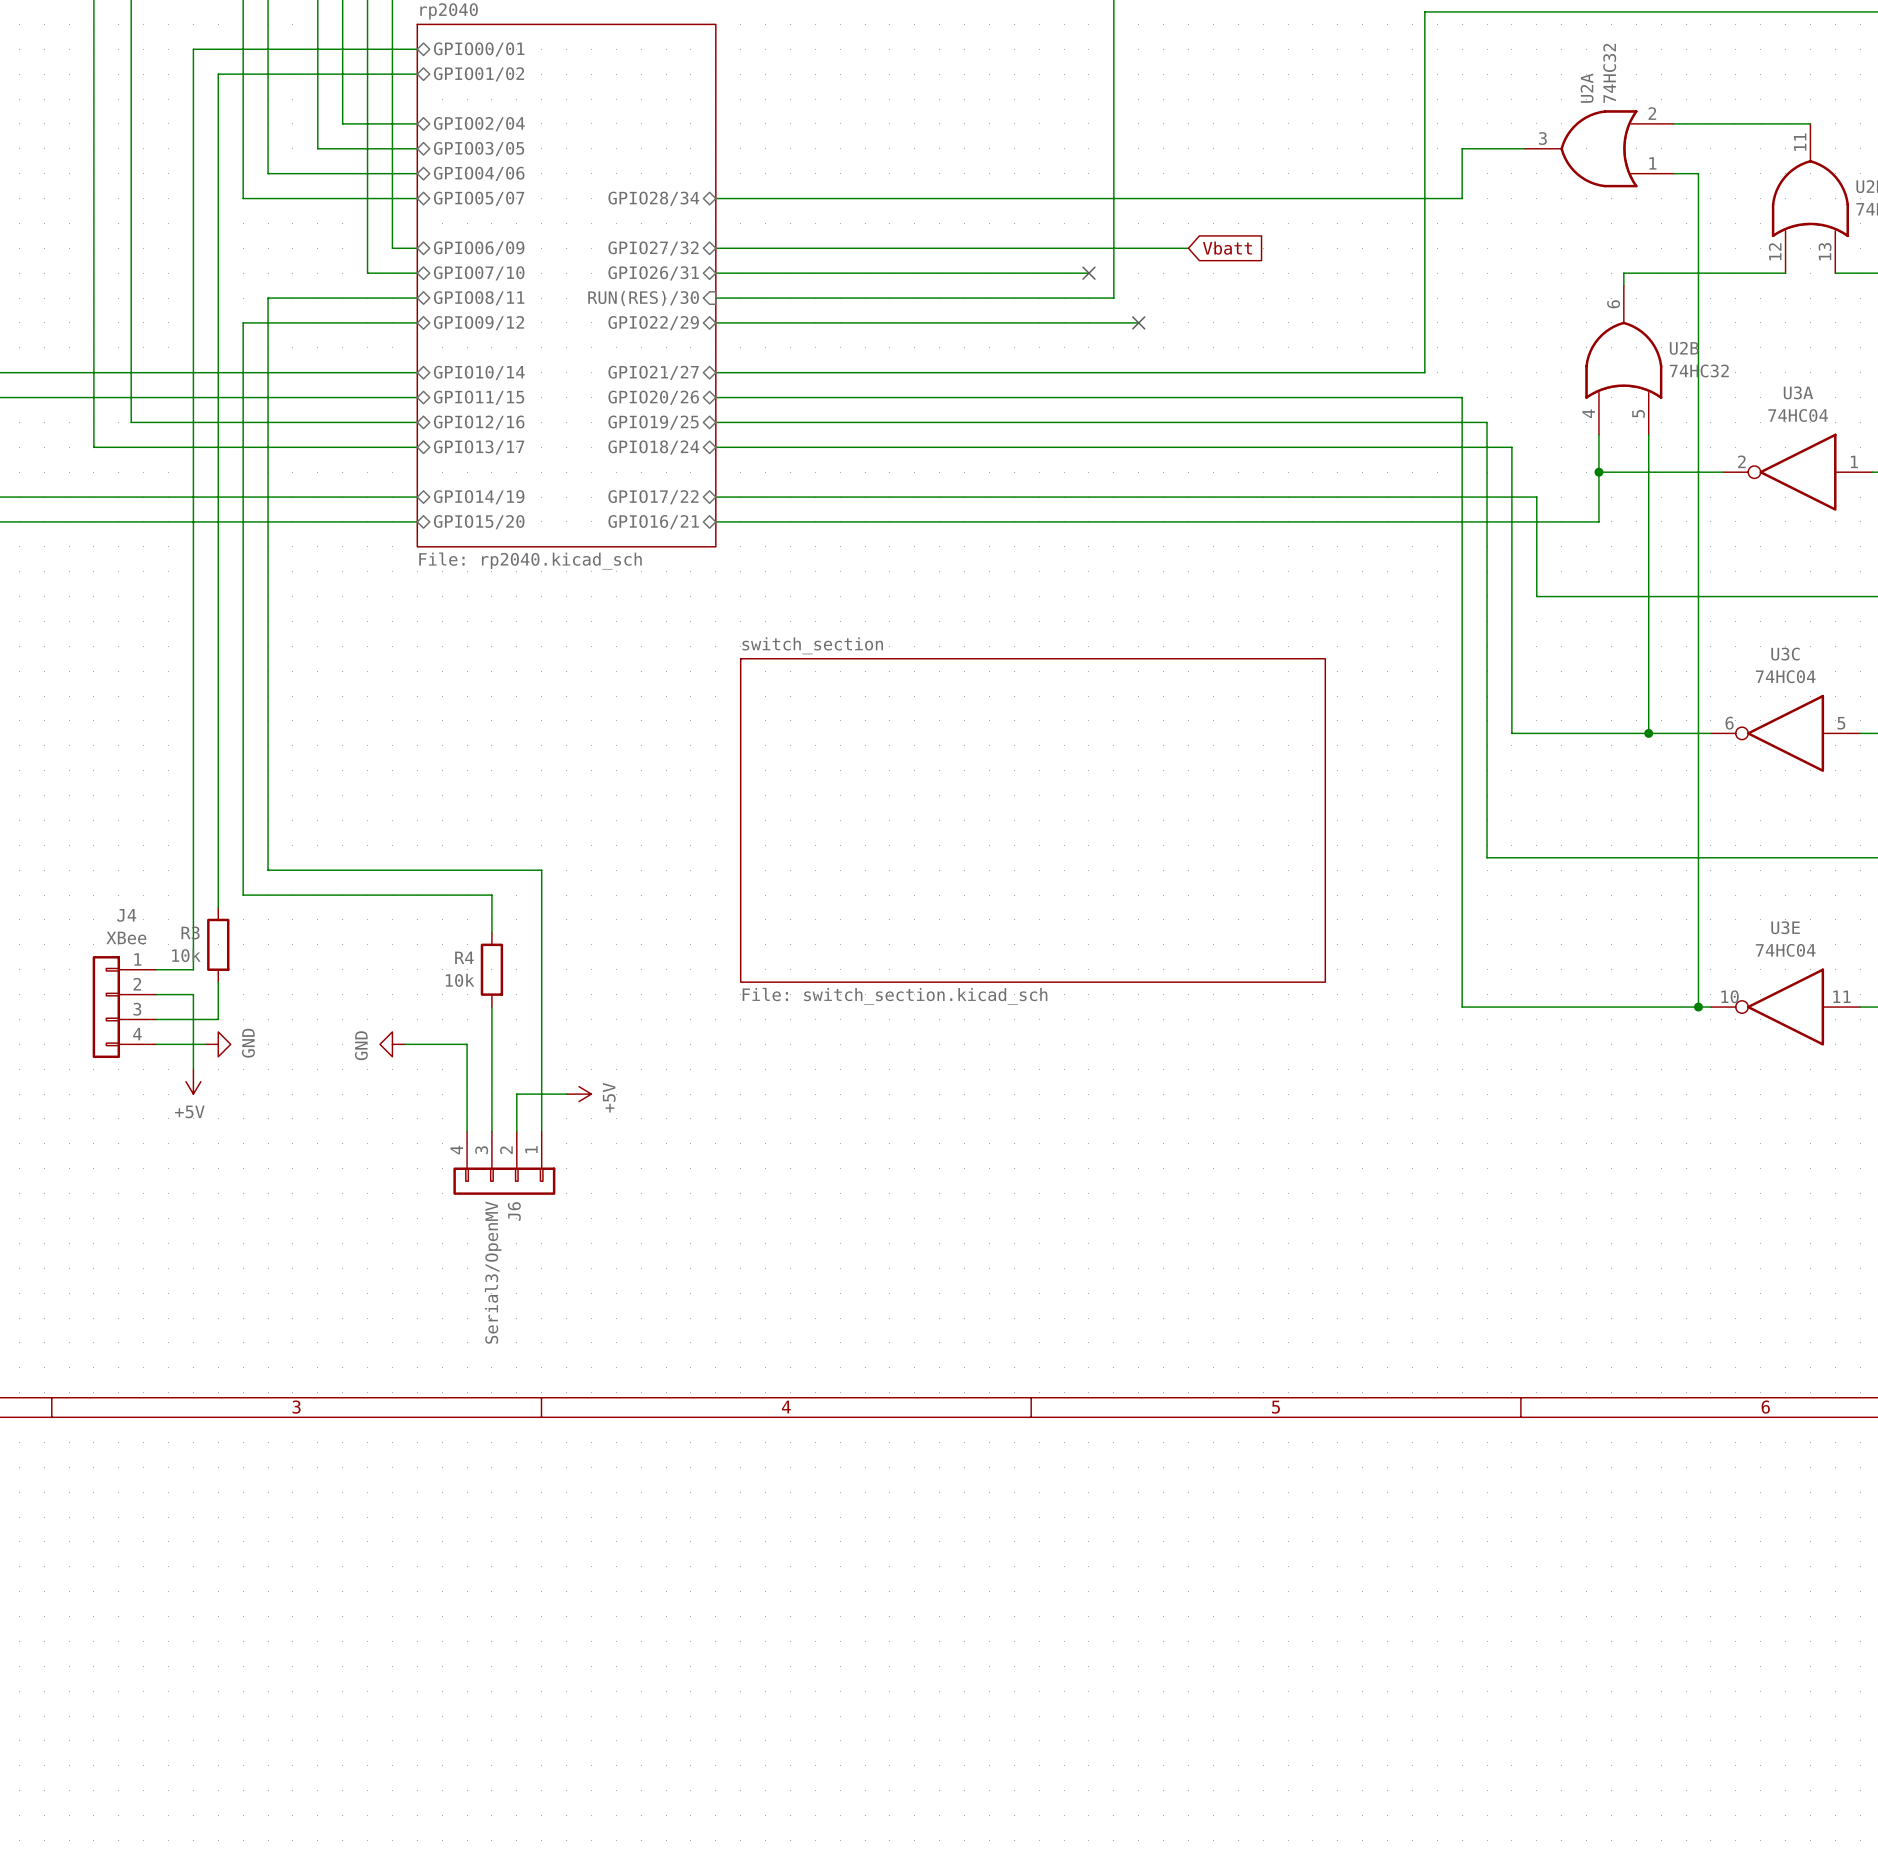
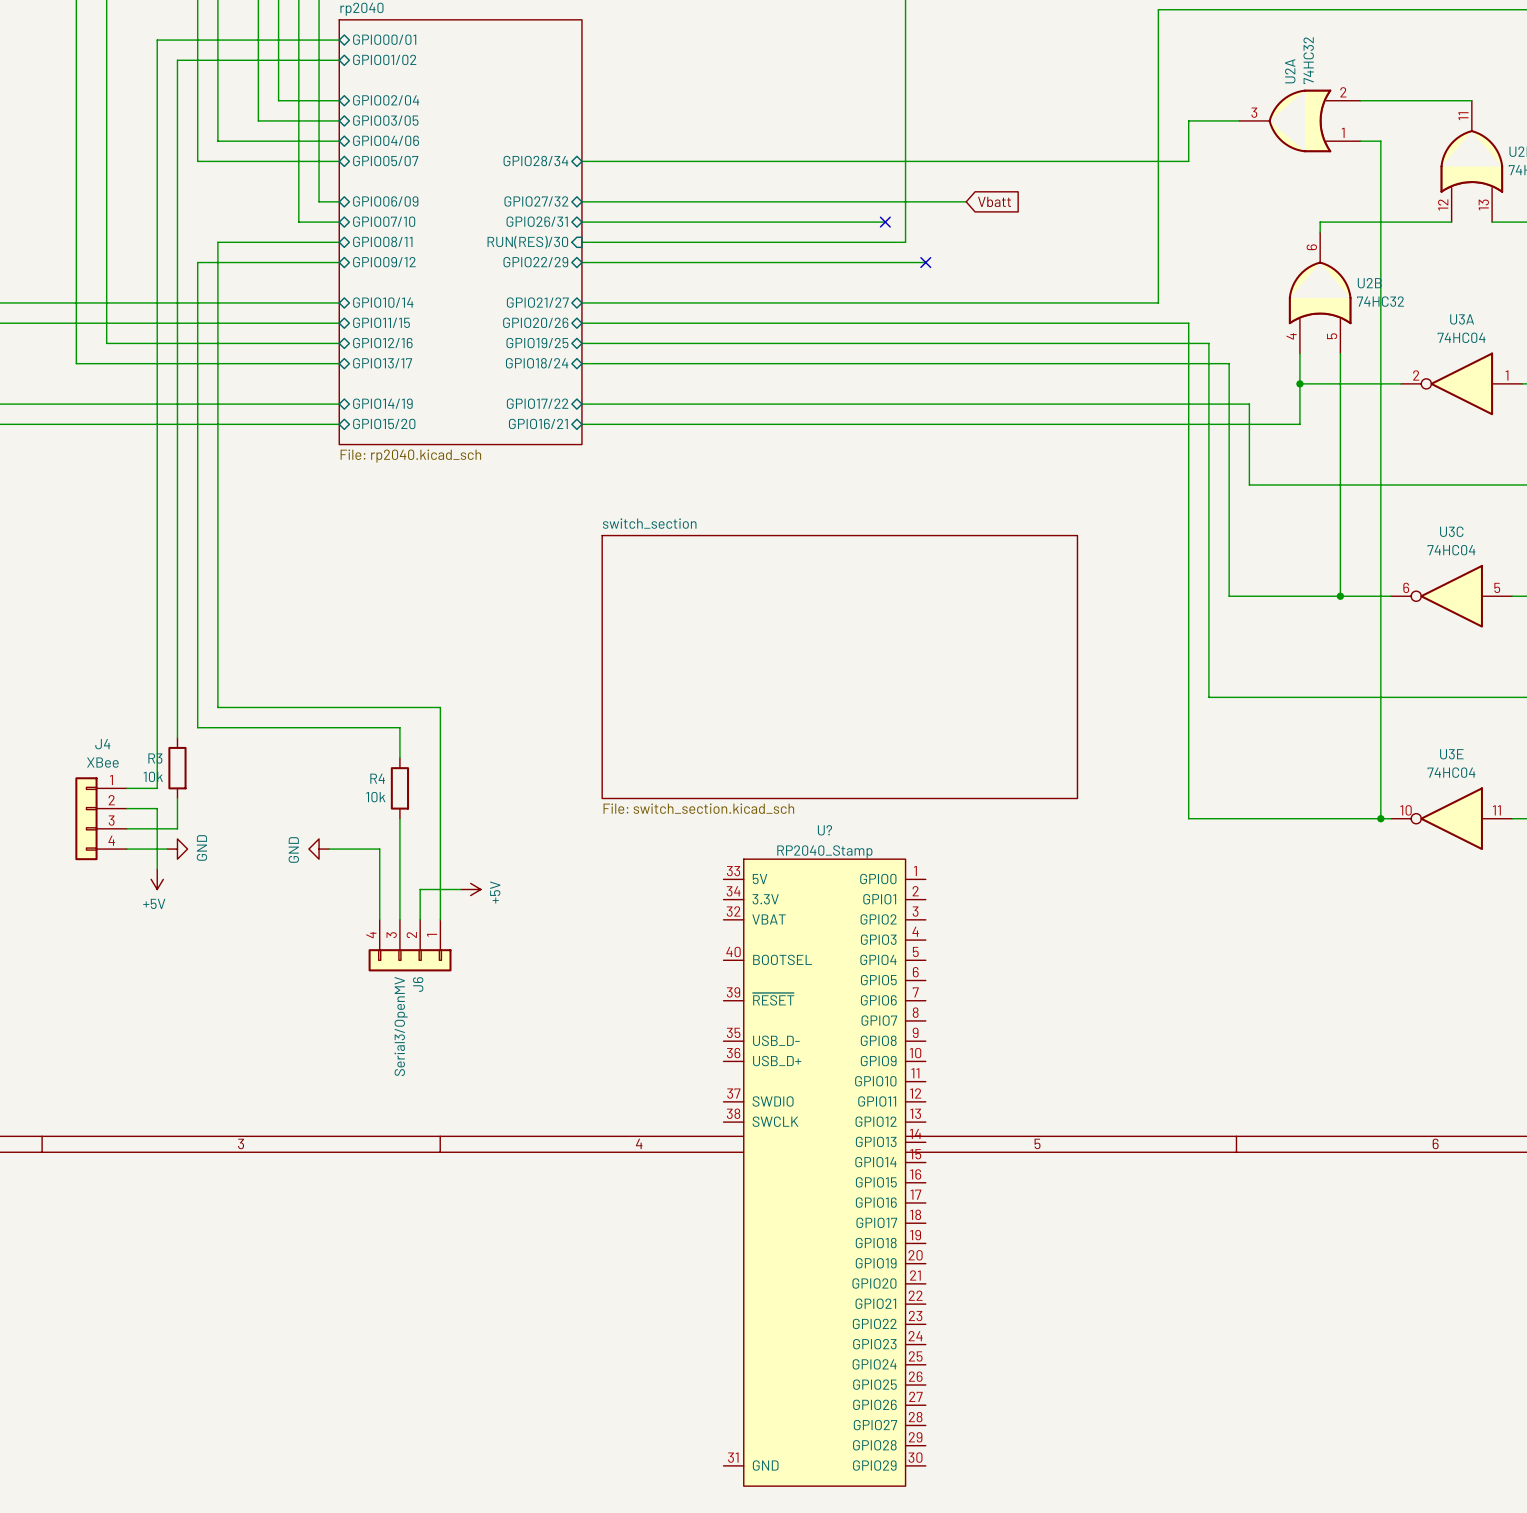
U?: none -> RP2040_Stamp (824, 1172)

